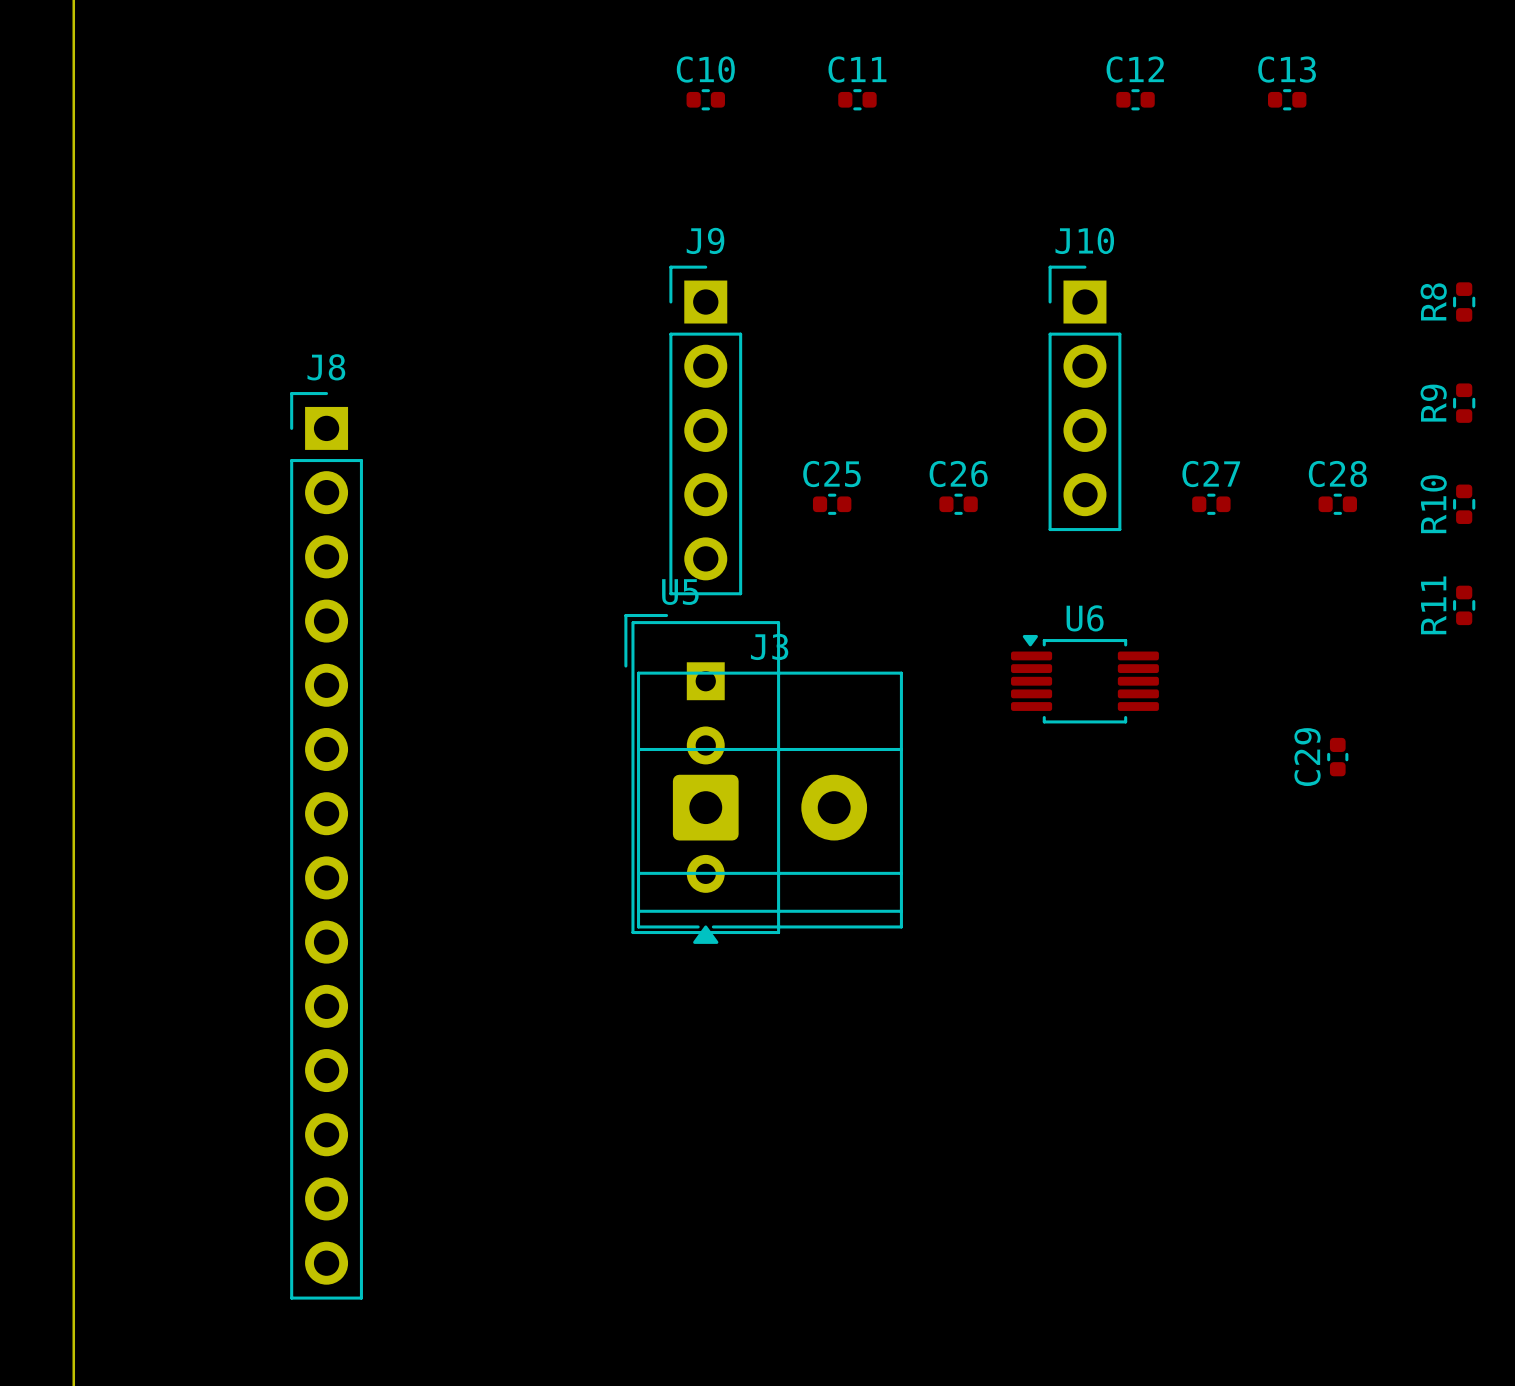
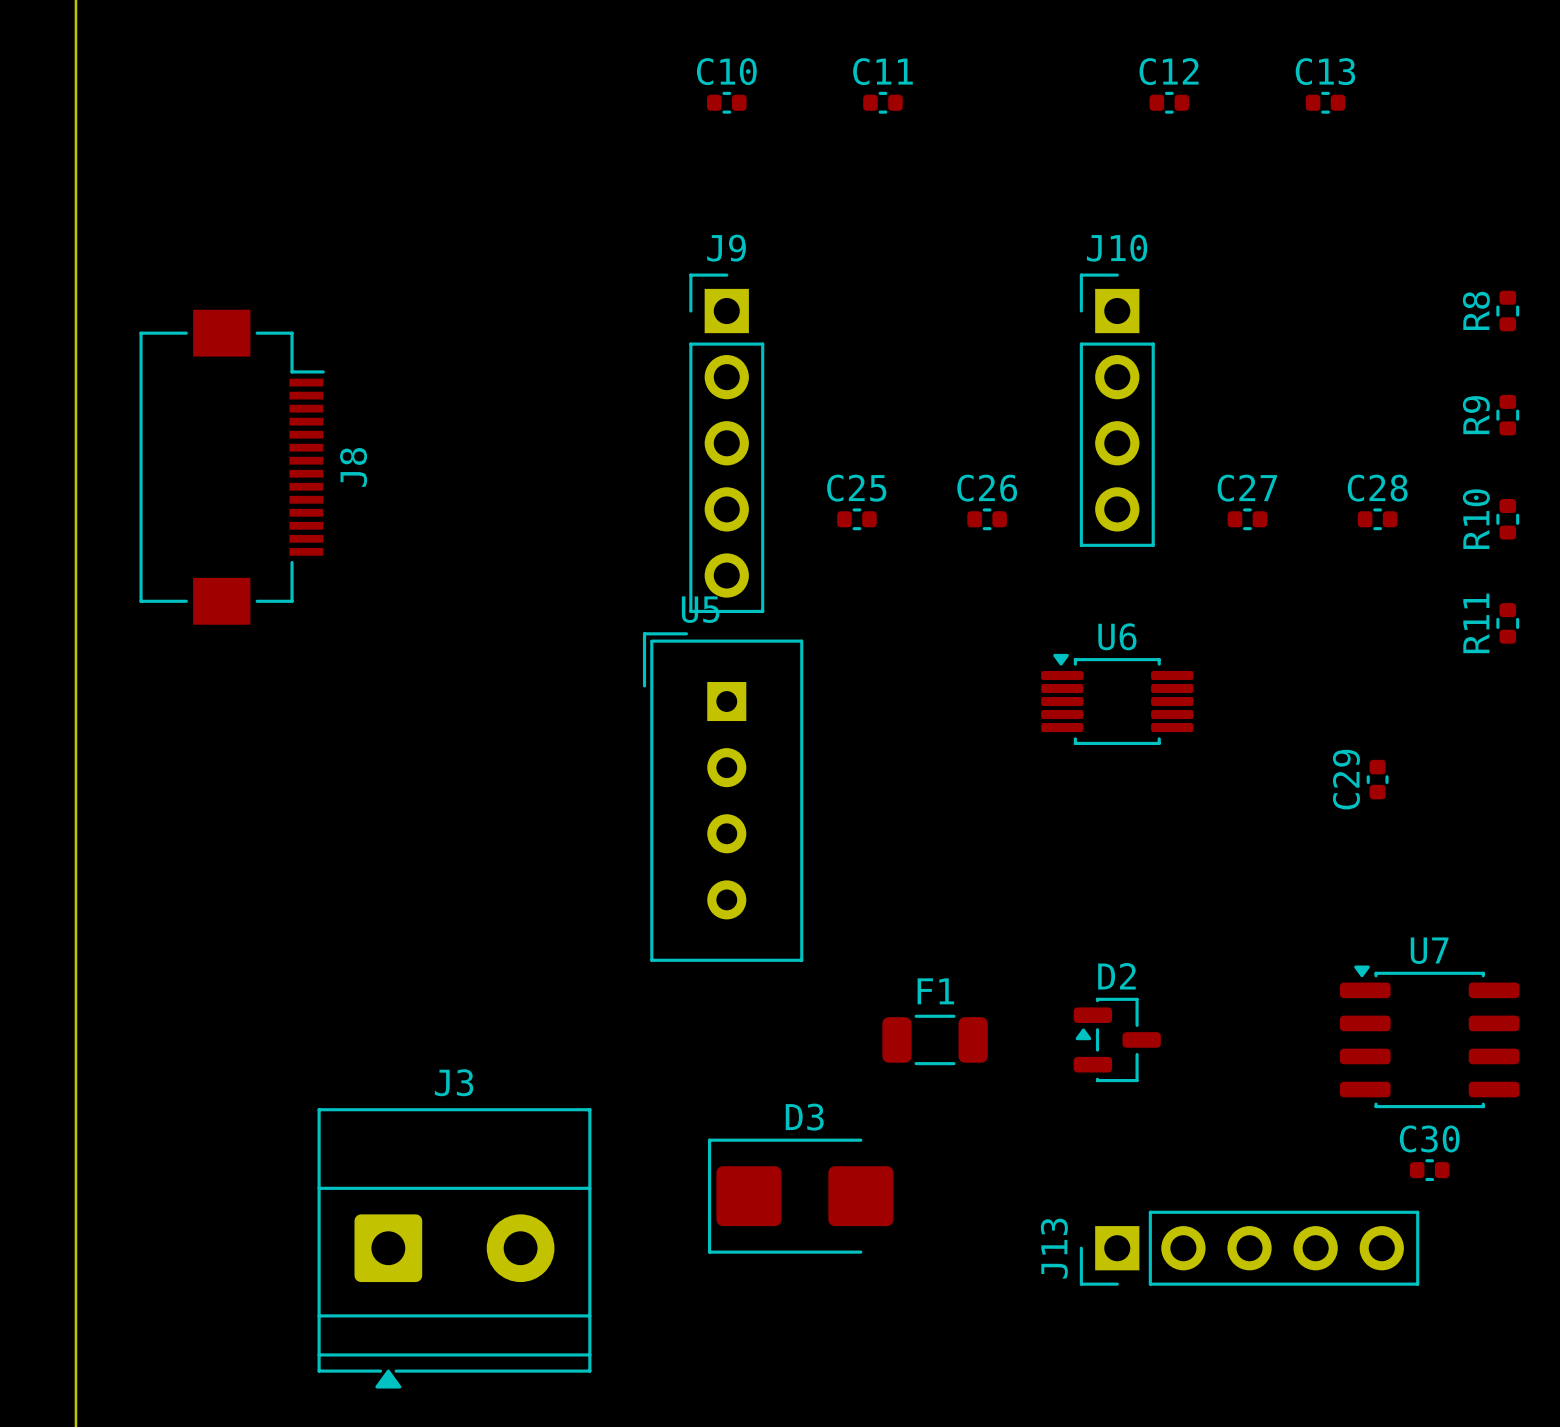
J8 name position: J8 (326, 367) -> J8 (353, 467)
J8 footprint: [290, 392, 363, 1300] -> [139, 309, 325, 625]
J3 position: (769, 807) -> (454, 1248)
U7: none -> (1429, 1036)
F1: none -> (935, 1039)
D2: none -> (1117, 1039)
C30: none -> (1429, 1170)
D3: none -> (800, 1196)
J13: none -> (1249, 1248)

